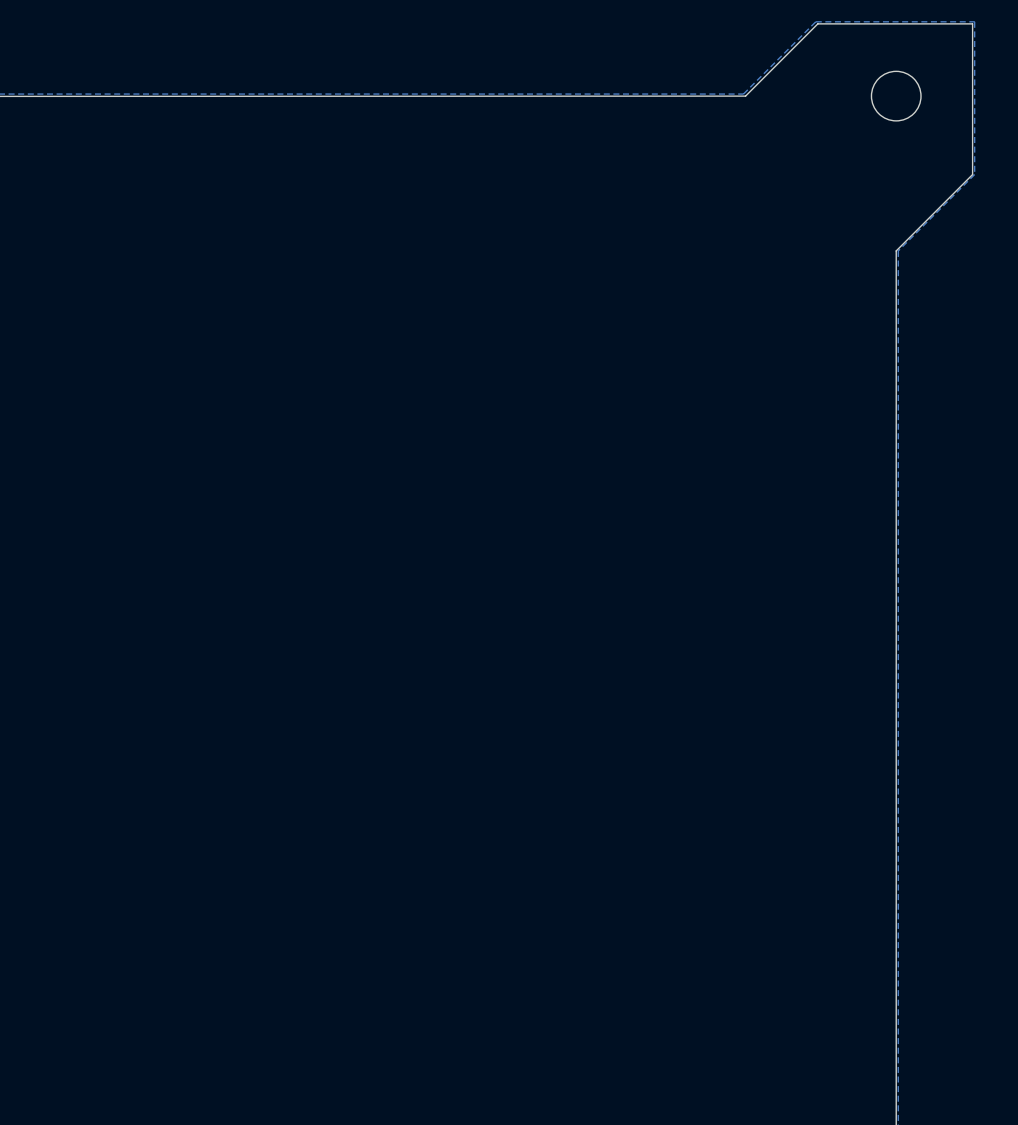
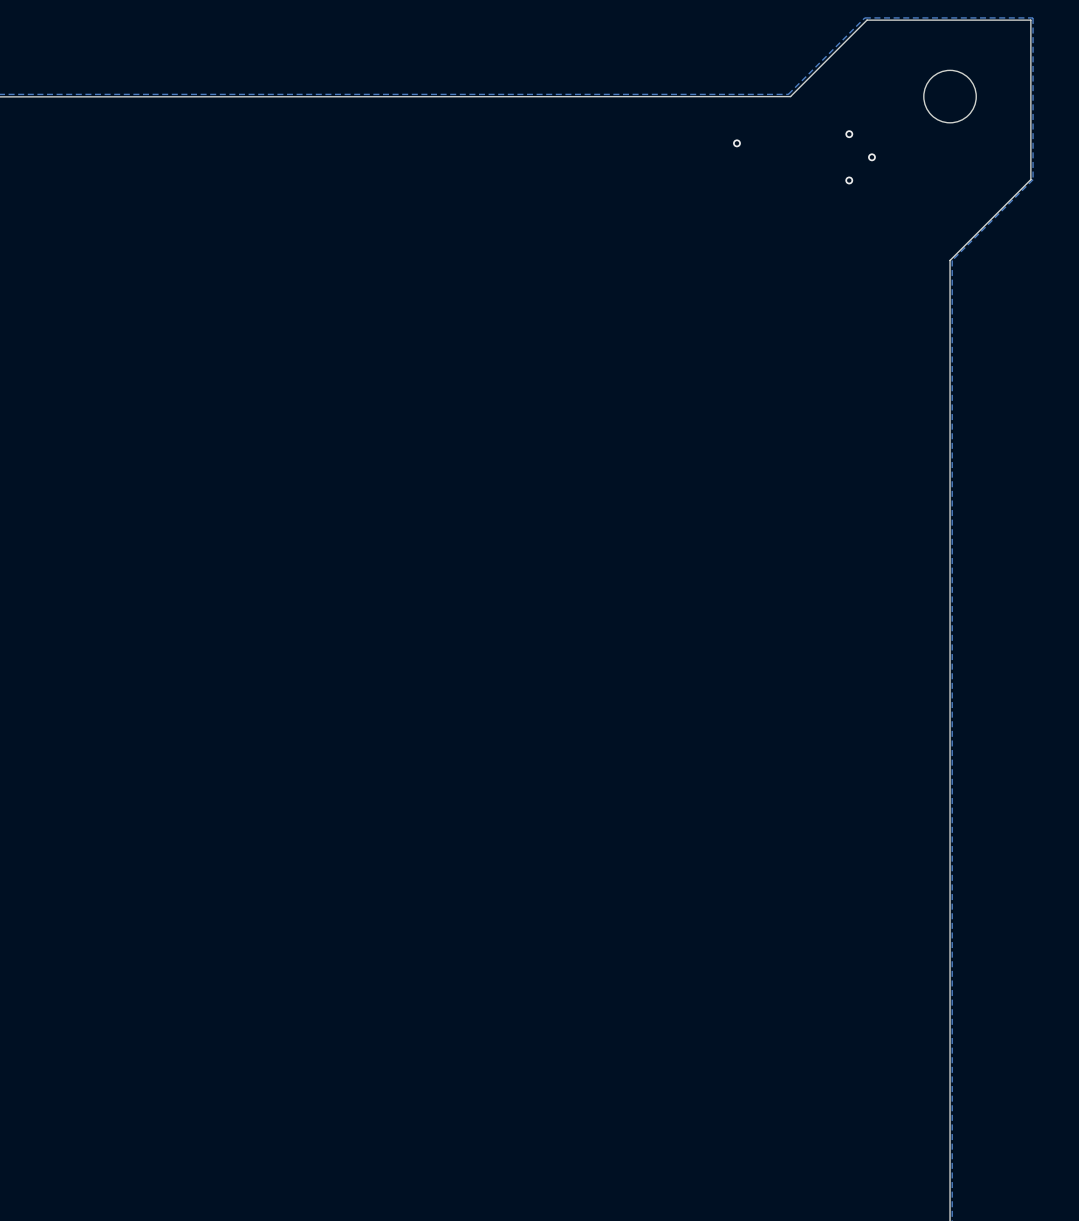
via: none -> (849, 134)
via: none -> (736, 143)
via: none -> (871, 157)
via: none -> (849, 180)

